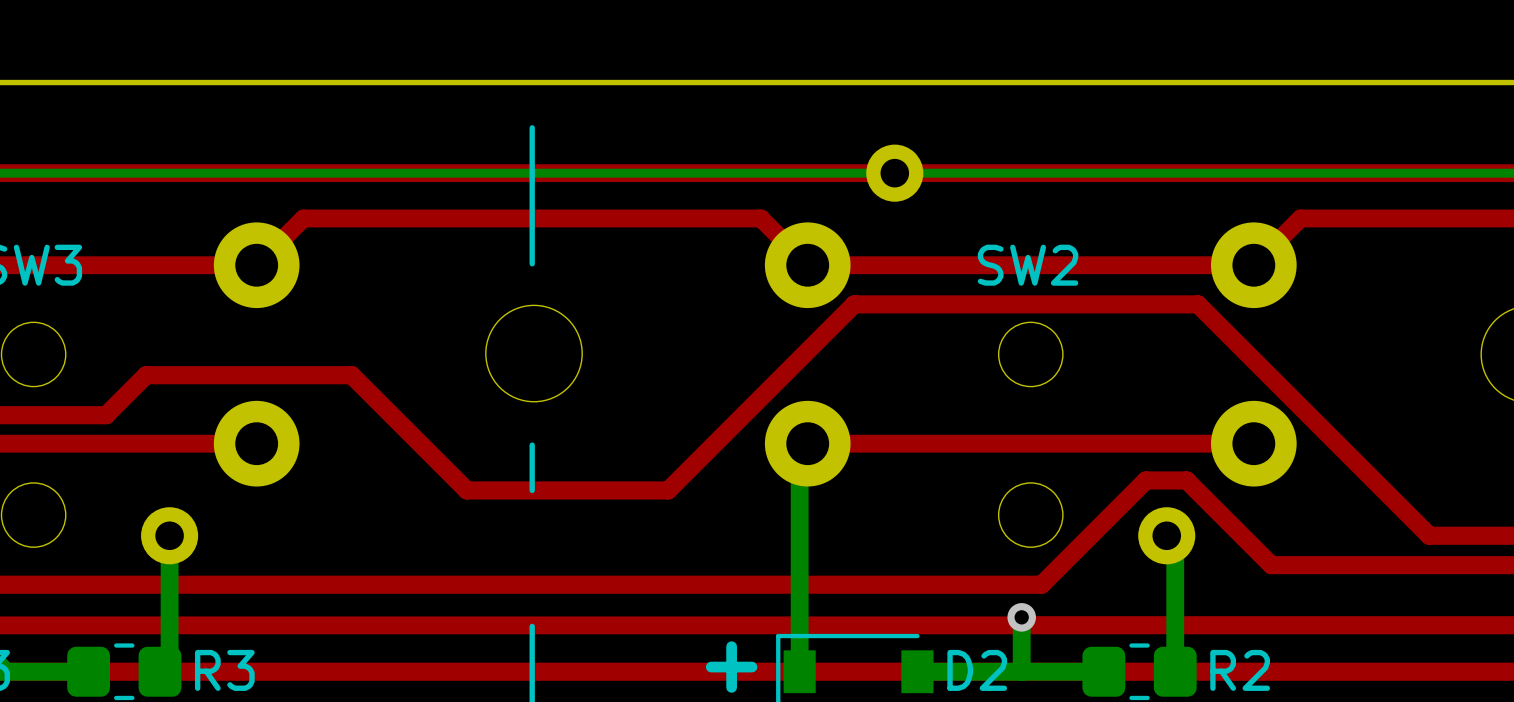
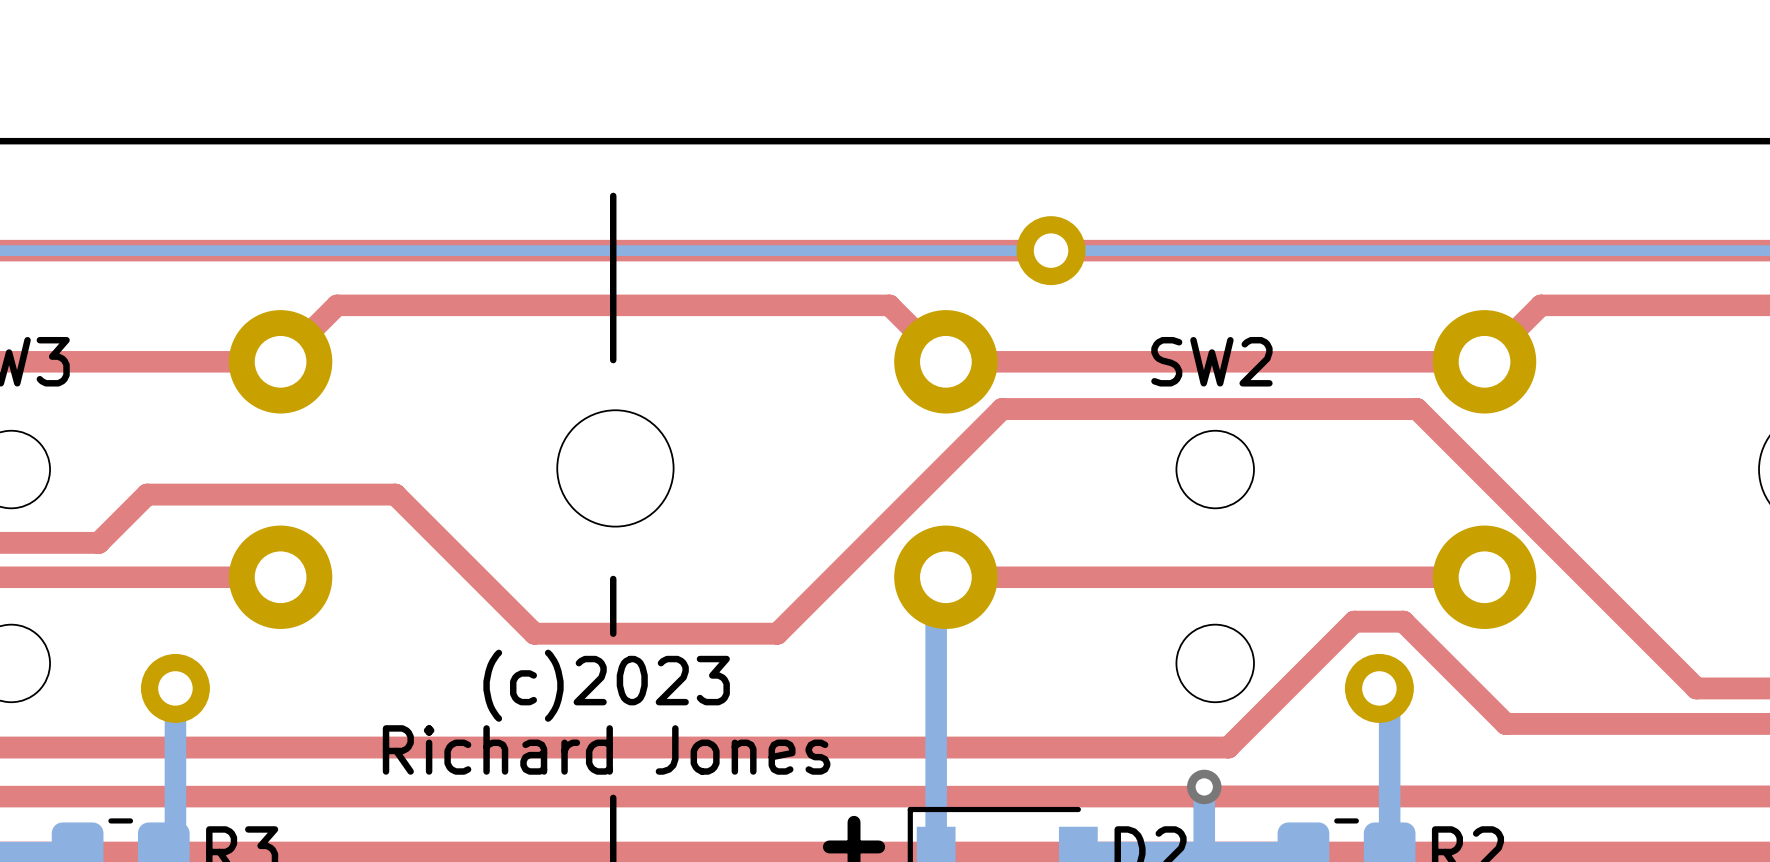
text: none -> (c)2023 (606, 685)
text: none -> Richard Jones (606, 749)

